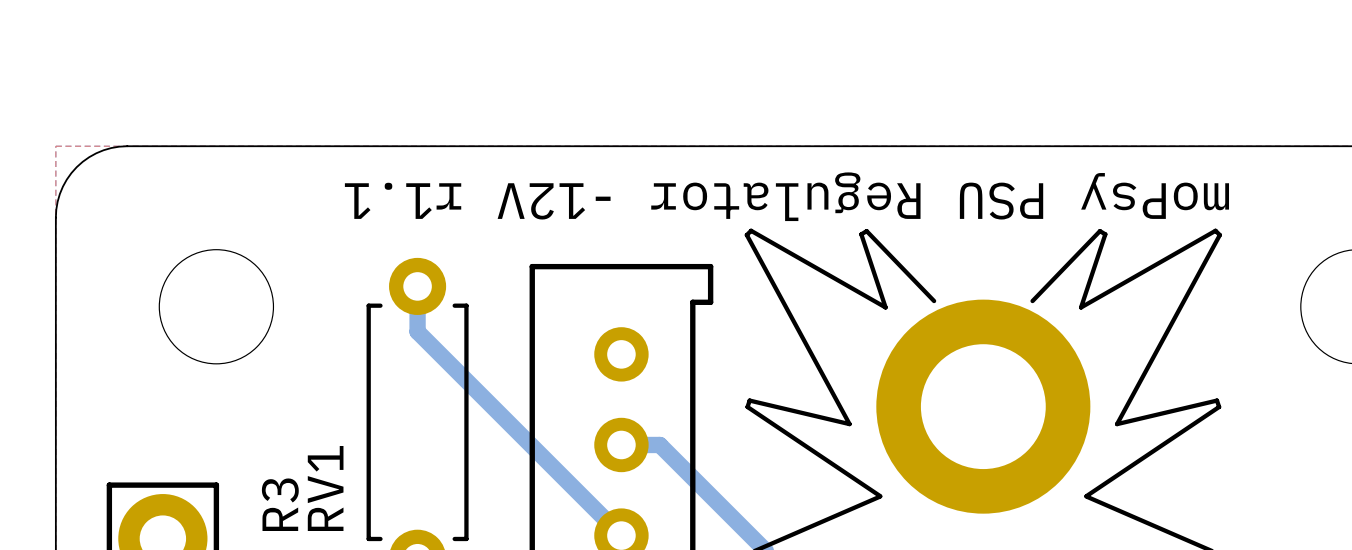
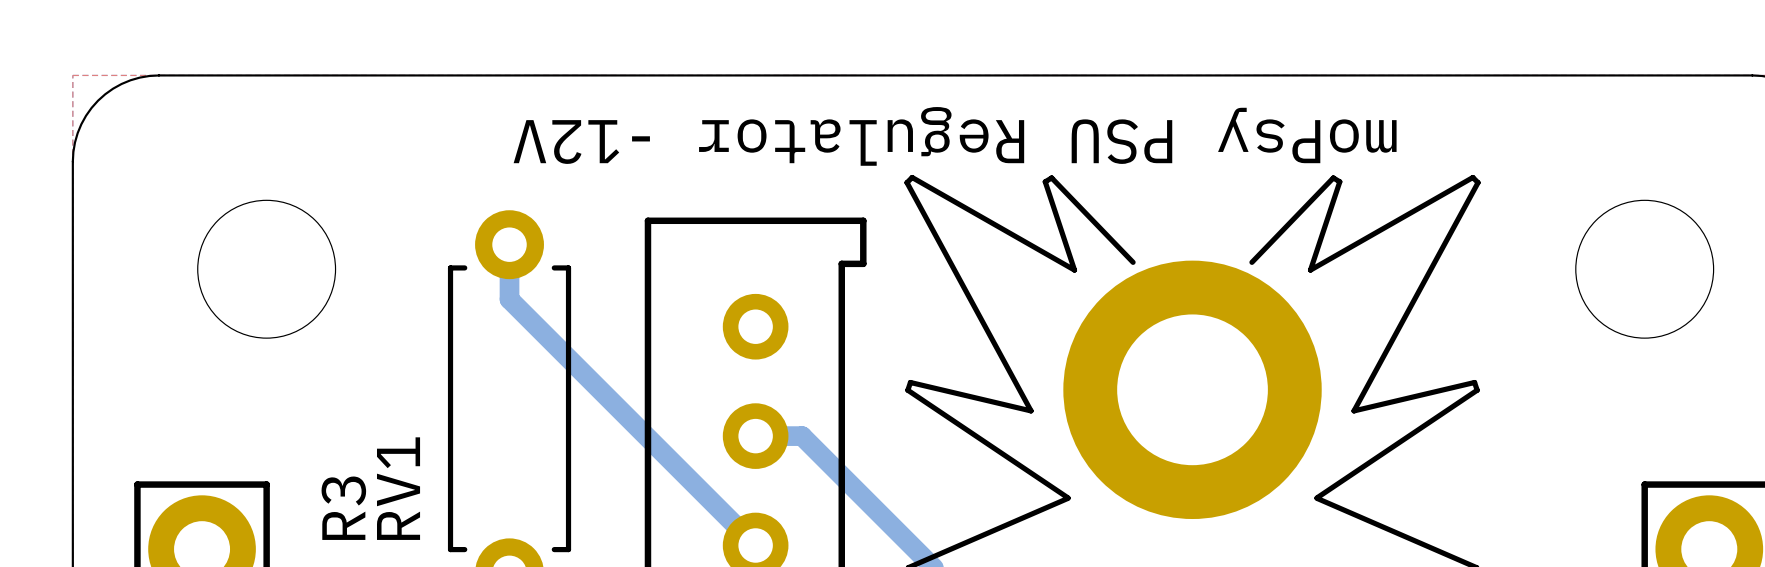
text: moPsy PSU Regulator -12V r1.1 (786, 196) -> moPsy PSU Regulator -12V (955, 136)

